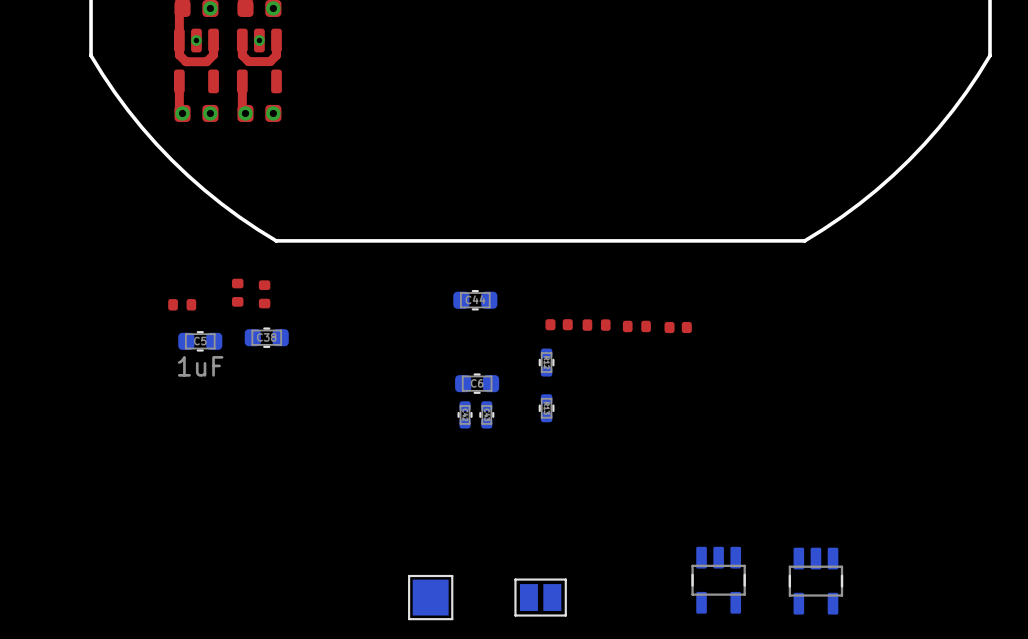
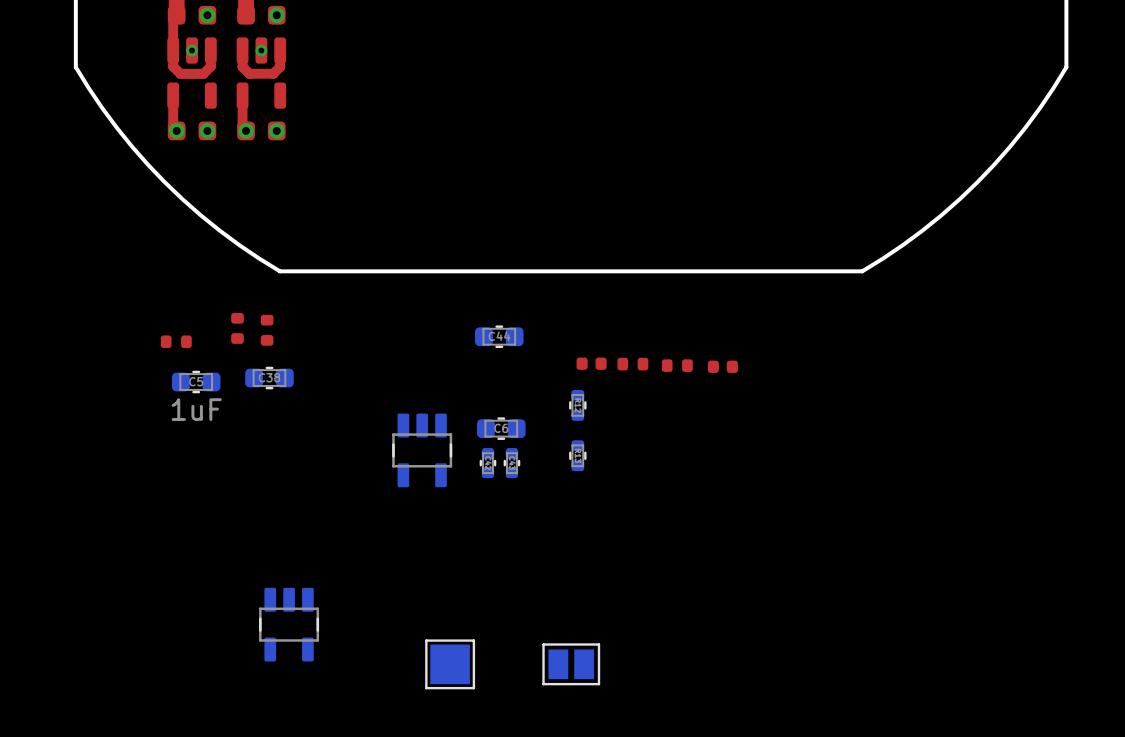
part: none -> (422, 450)
part: none -> (289, 624)
part: (718, 580) -> none
part: (815, 581) -> none

